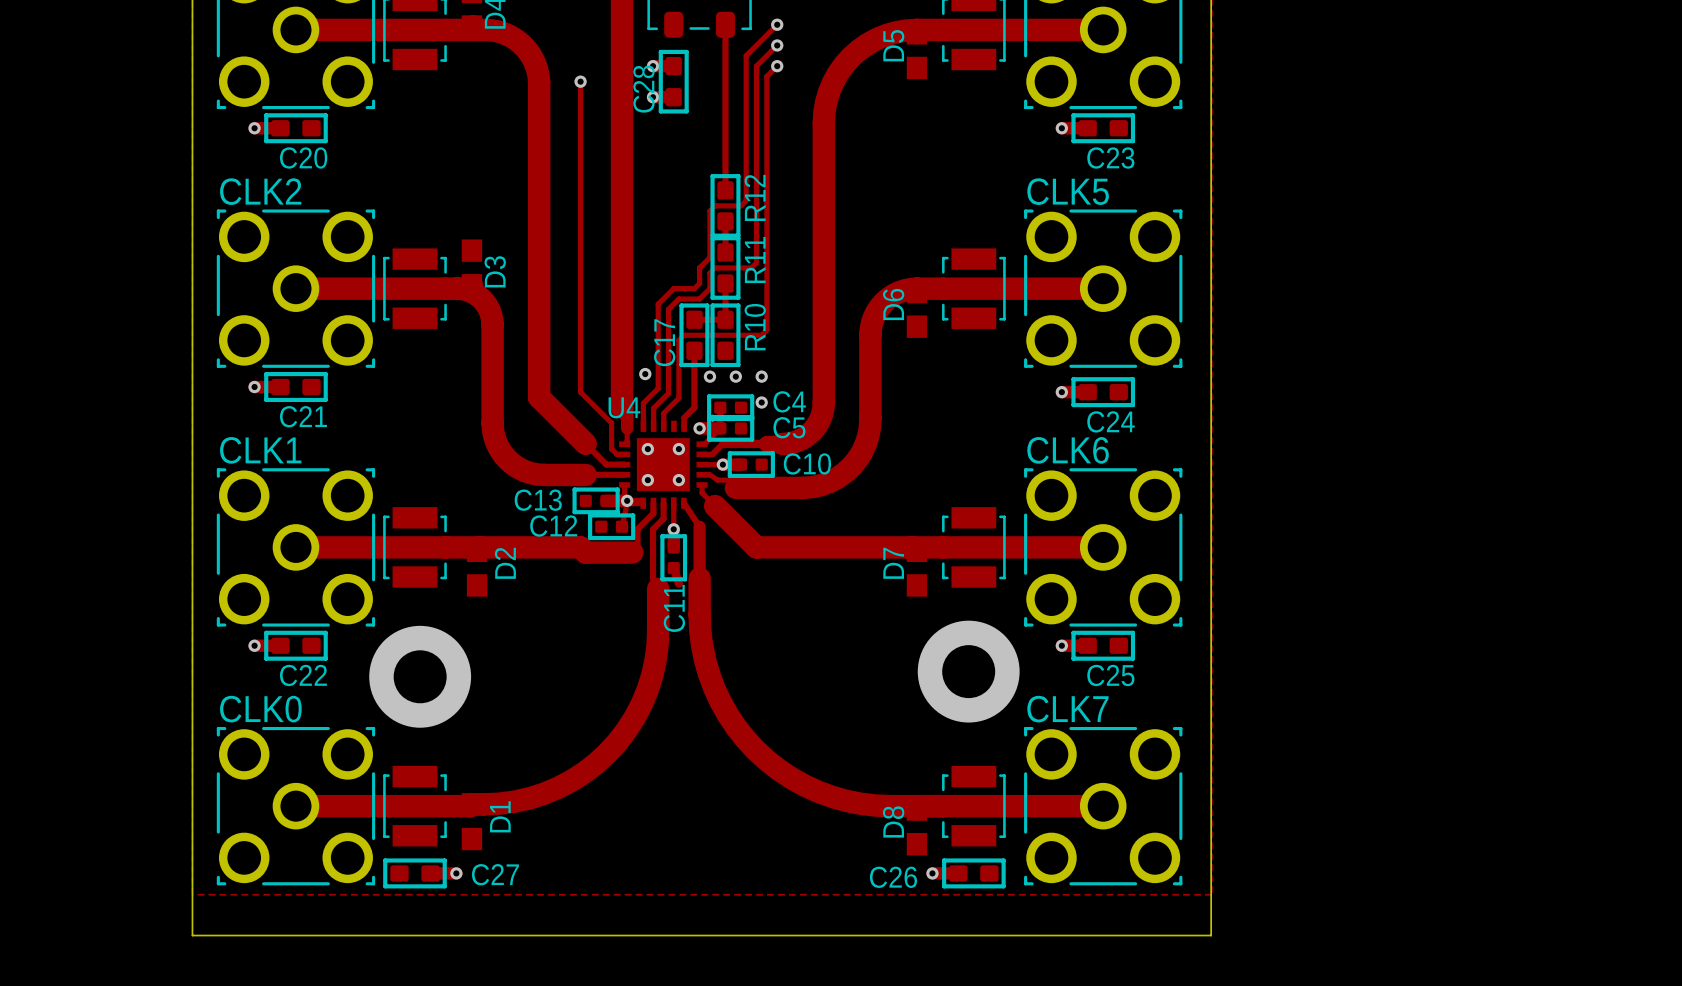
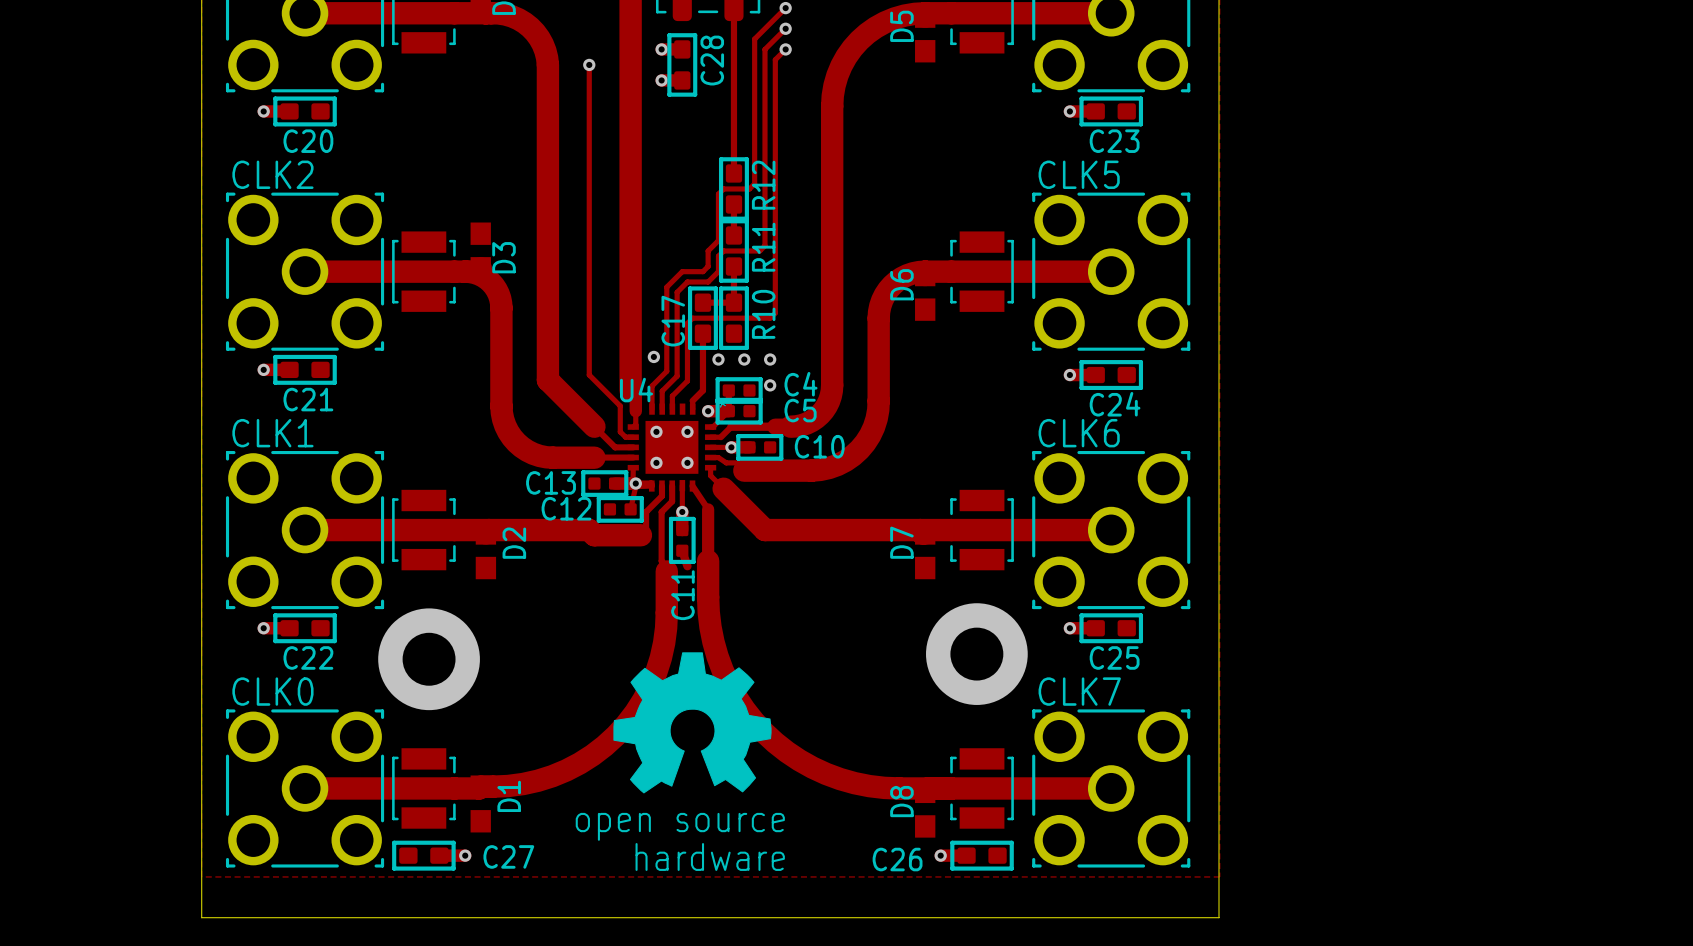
C28 name position: C28 (643, 89) -> C28 (712, 60)
drawing: none -> [613, 652, 772, 794]

